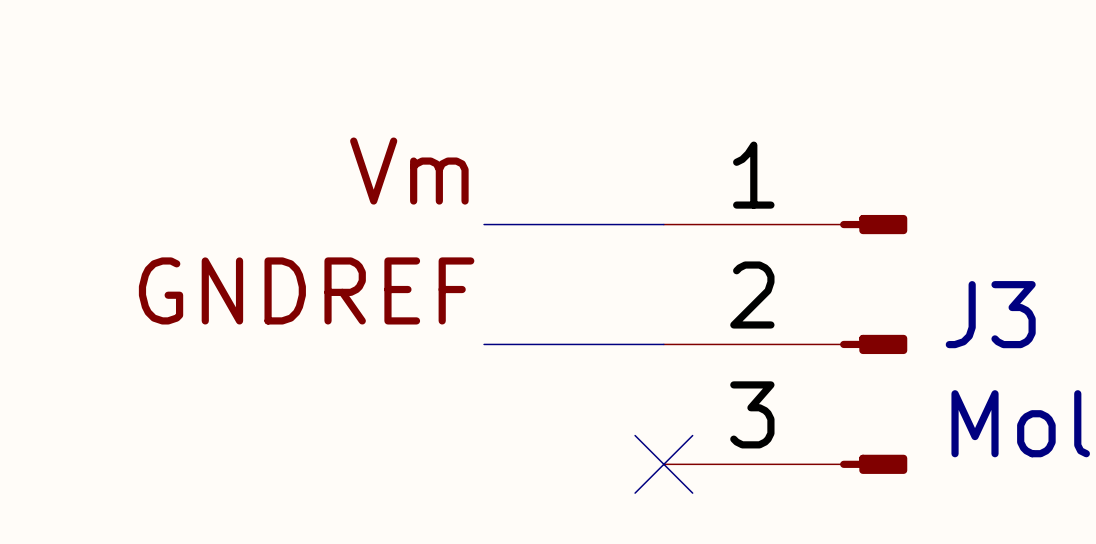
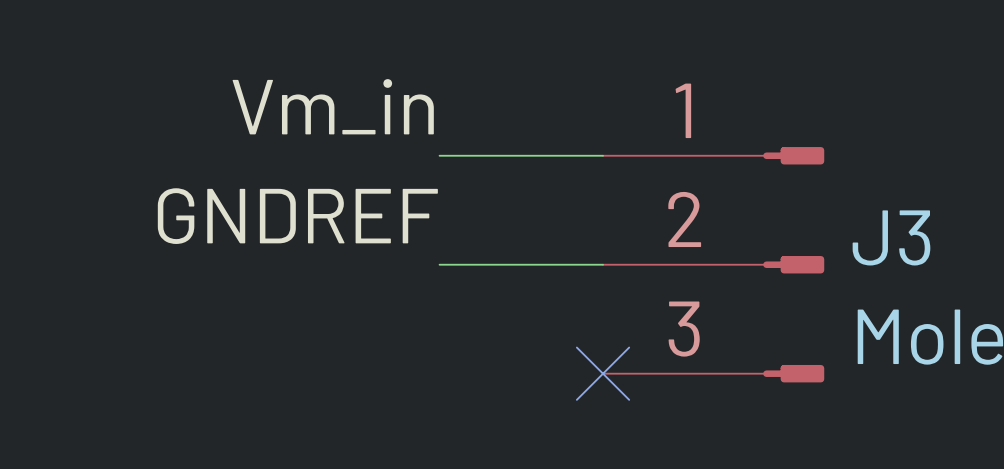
label: Vm (409, 171) -> Vm_in (333, 106)

